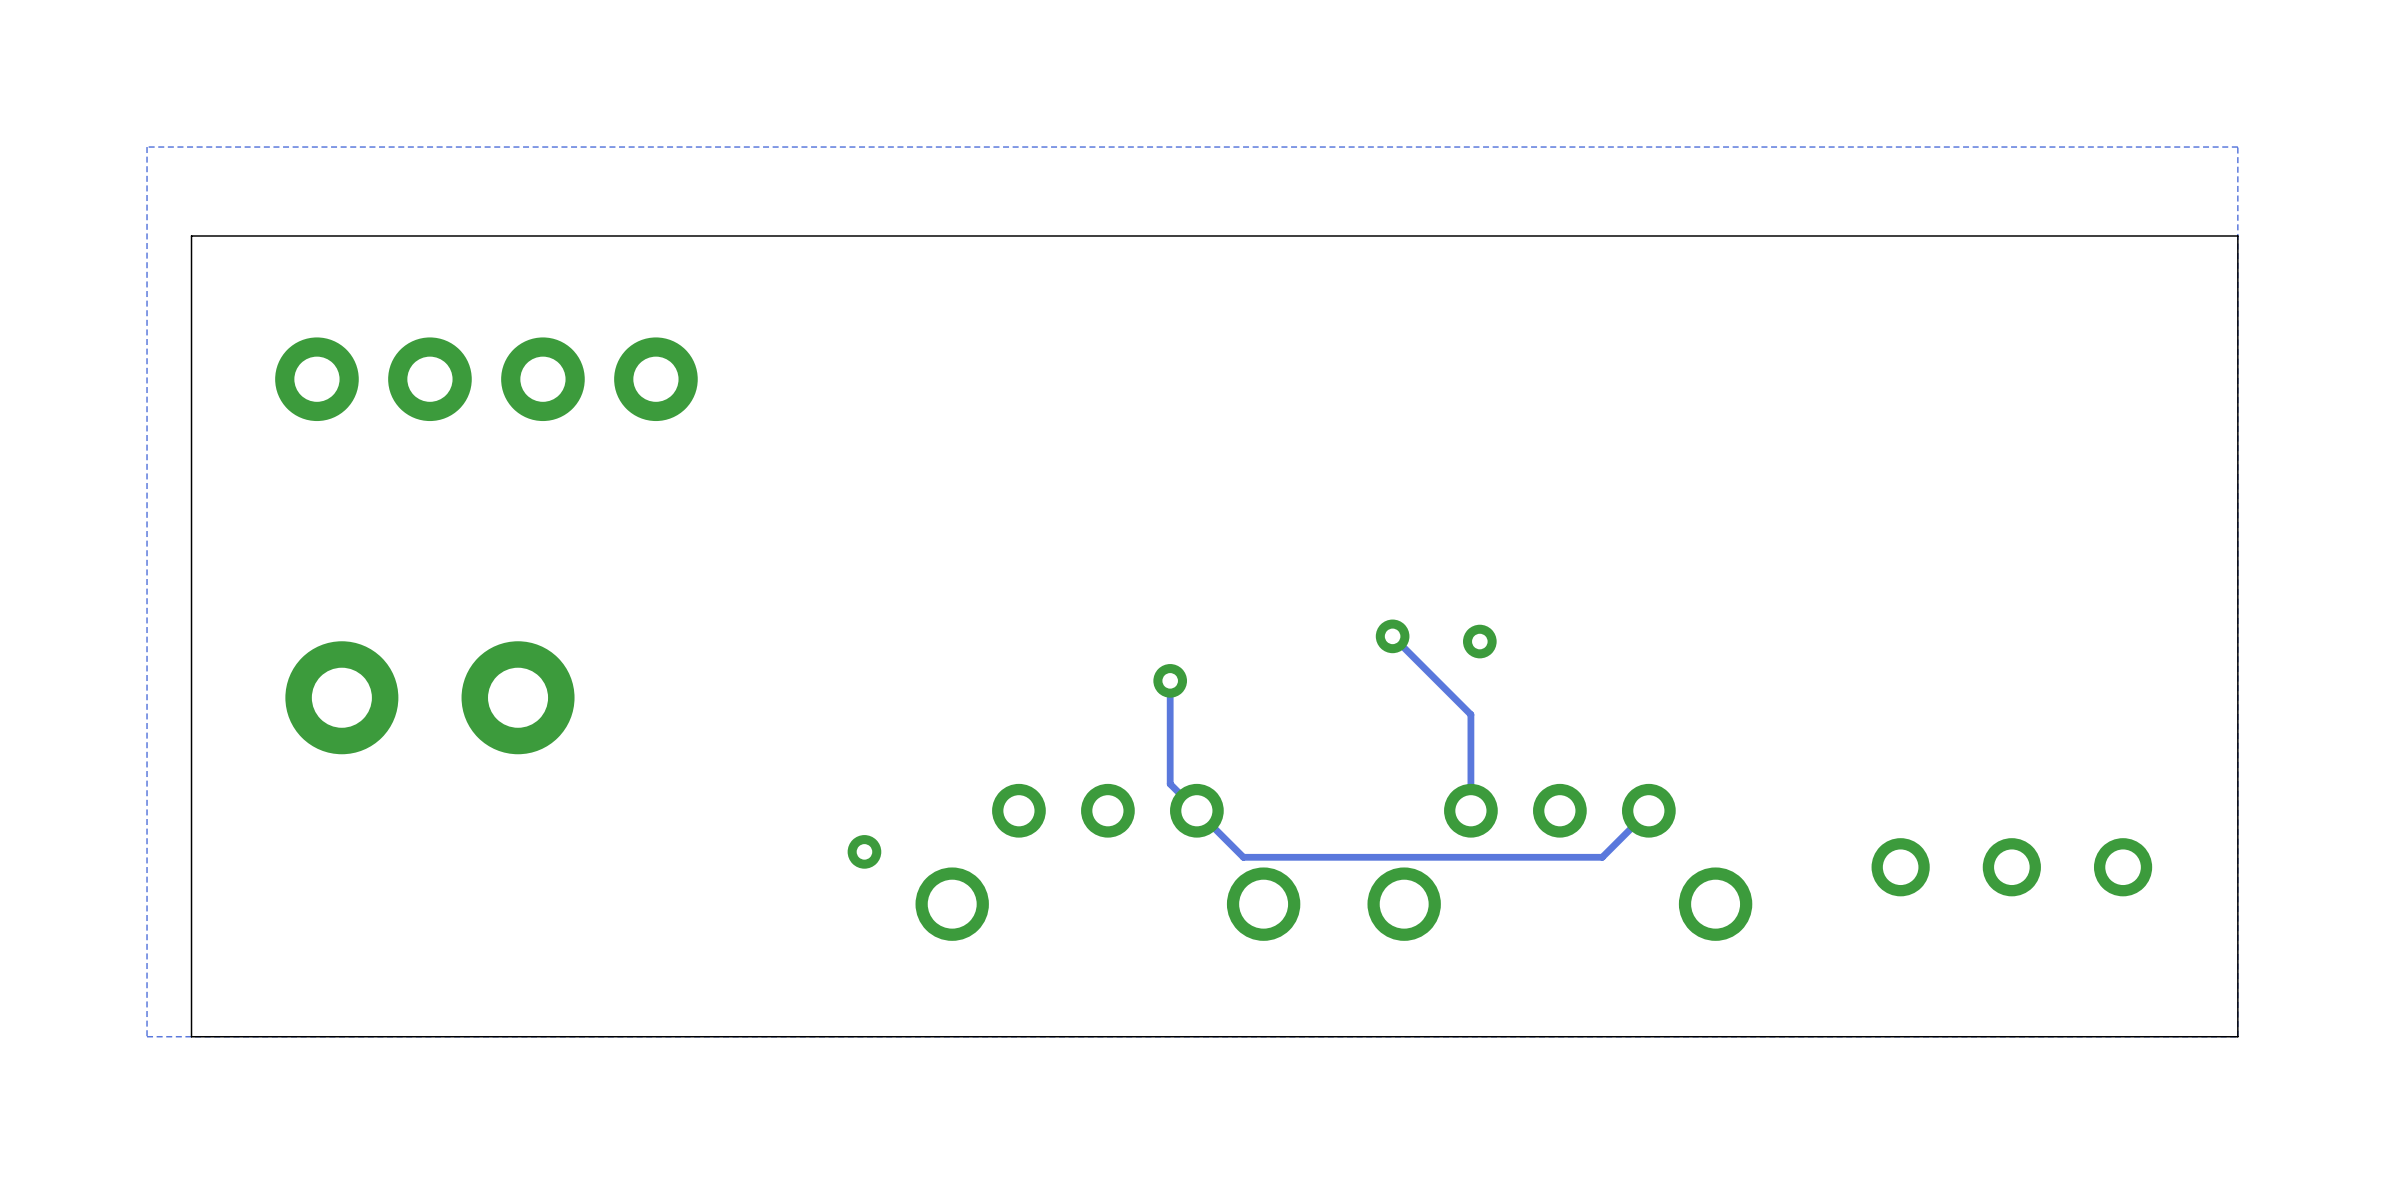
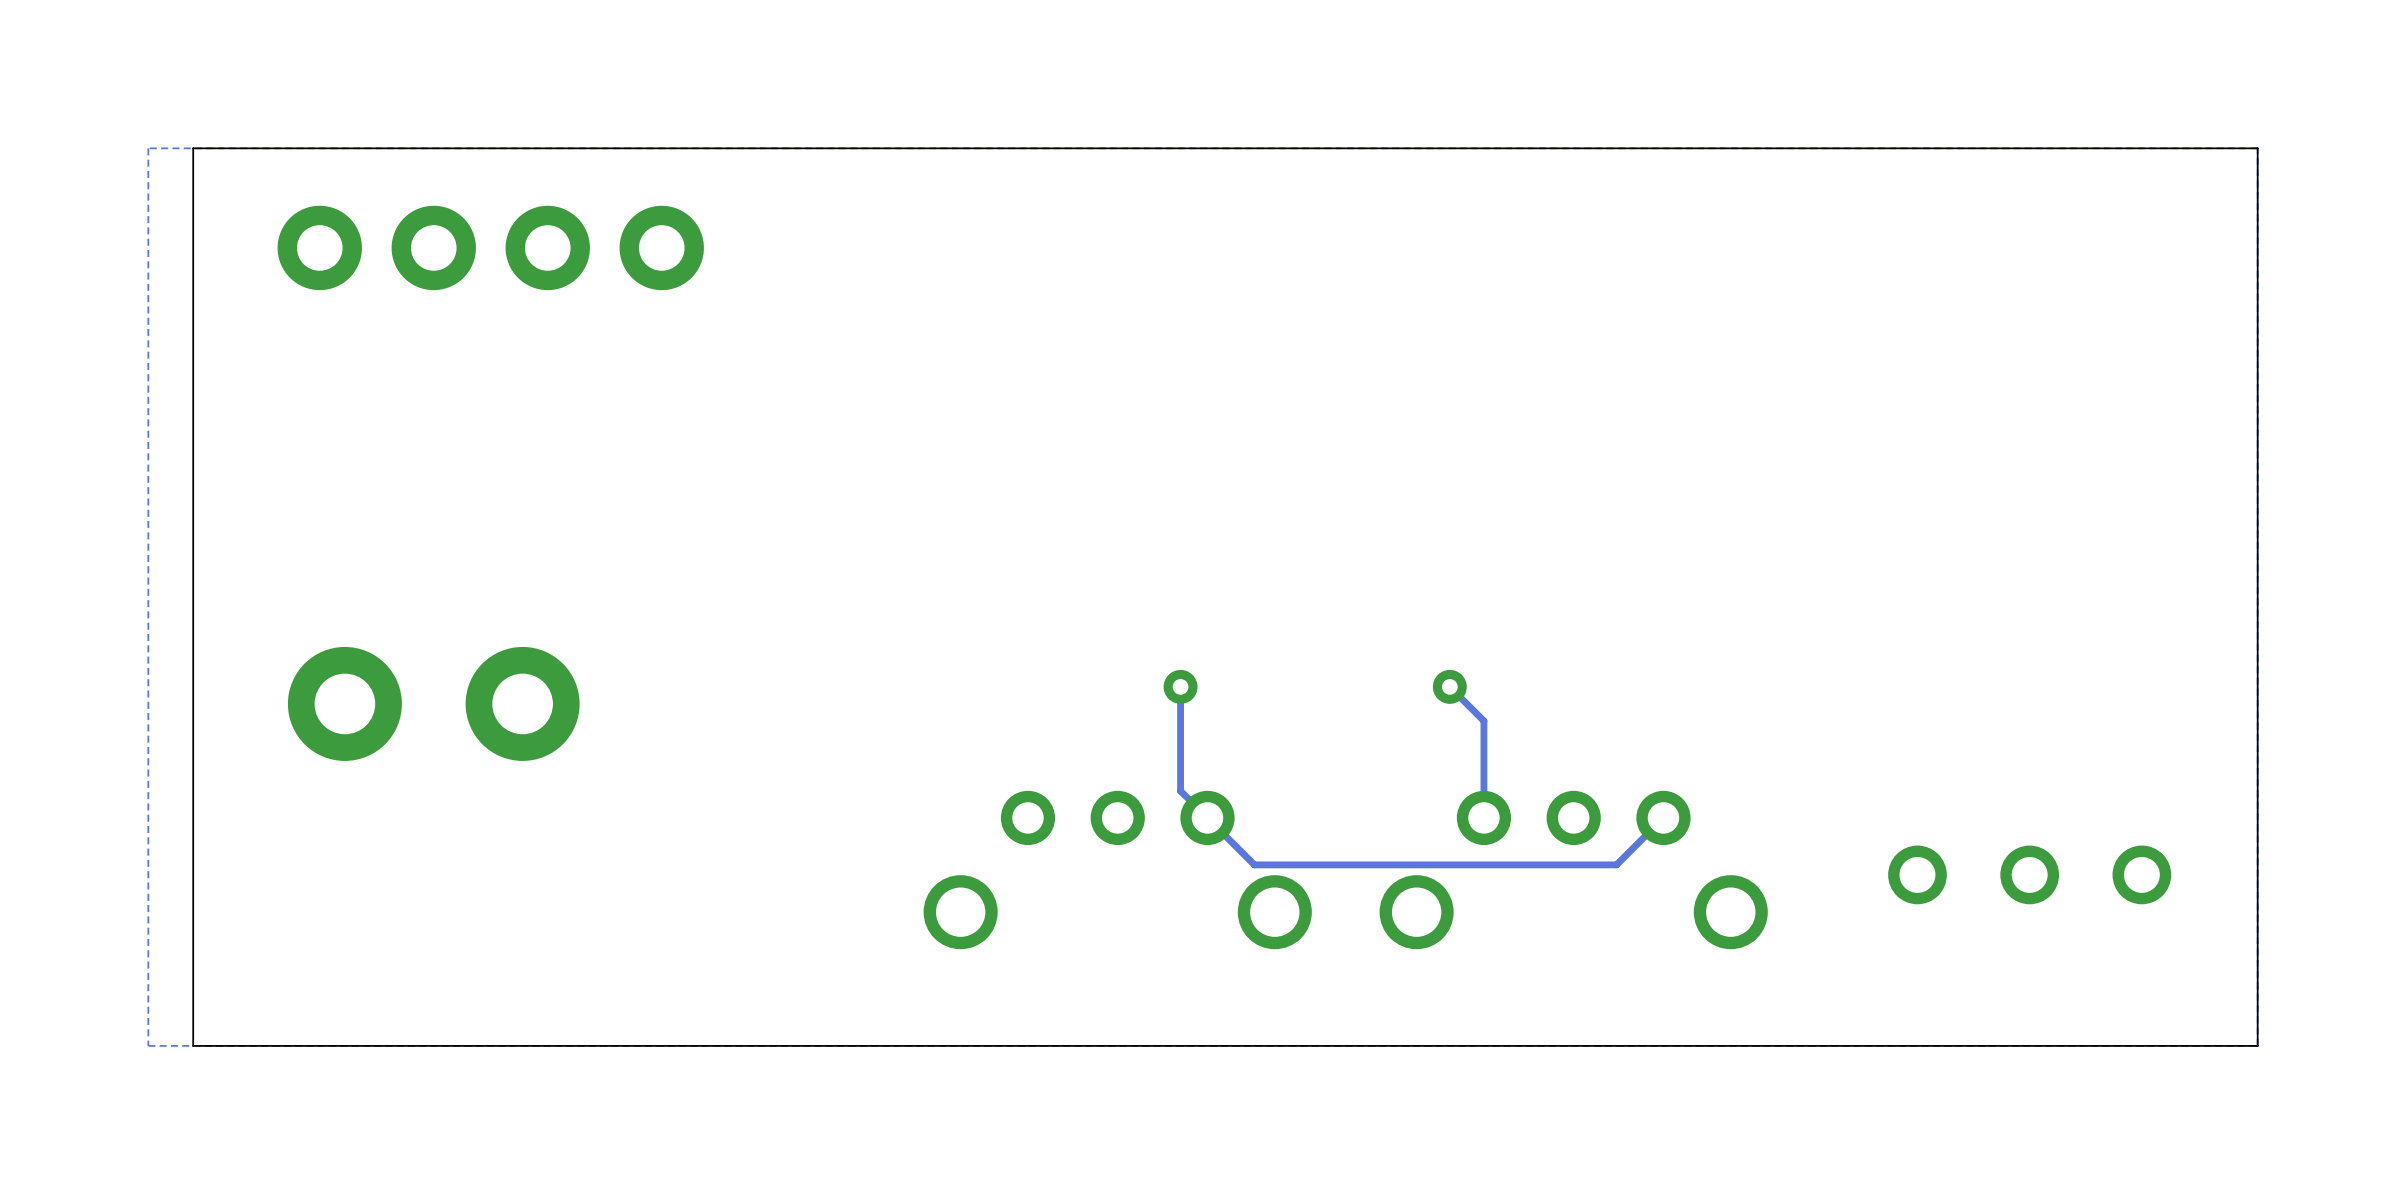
board edge: (2237, 235) (191, 235) -> (2257, 238) (2257, 148) (193, 148) (193, 238)
part position: (486, 379) -> (490, 247)
track: (1392, 636) (1437, 680) -> none
via: (1392, 636) -> none
via: (1479, 641) -> none
via: none -> (1449, 686)
via: (864, 851) -> none

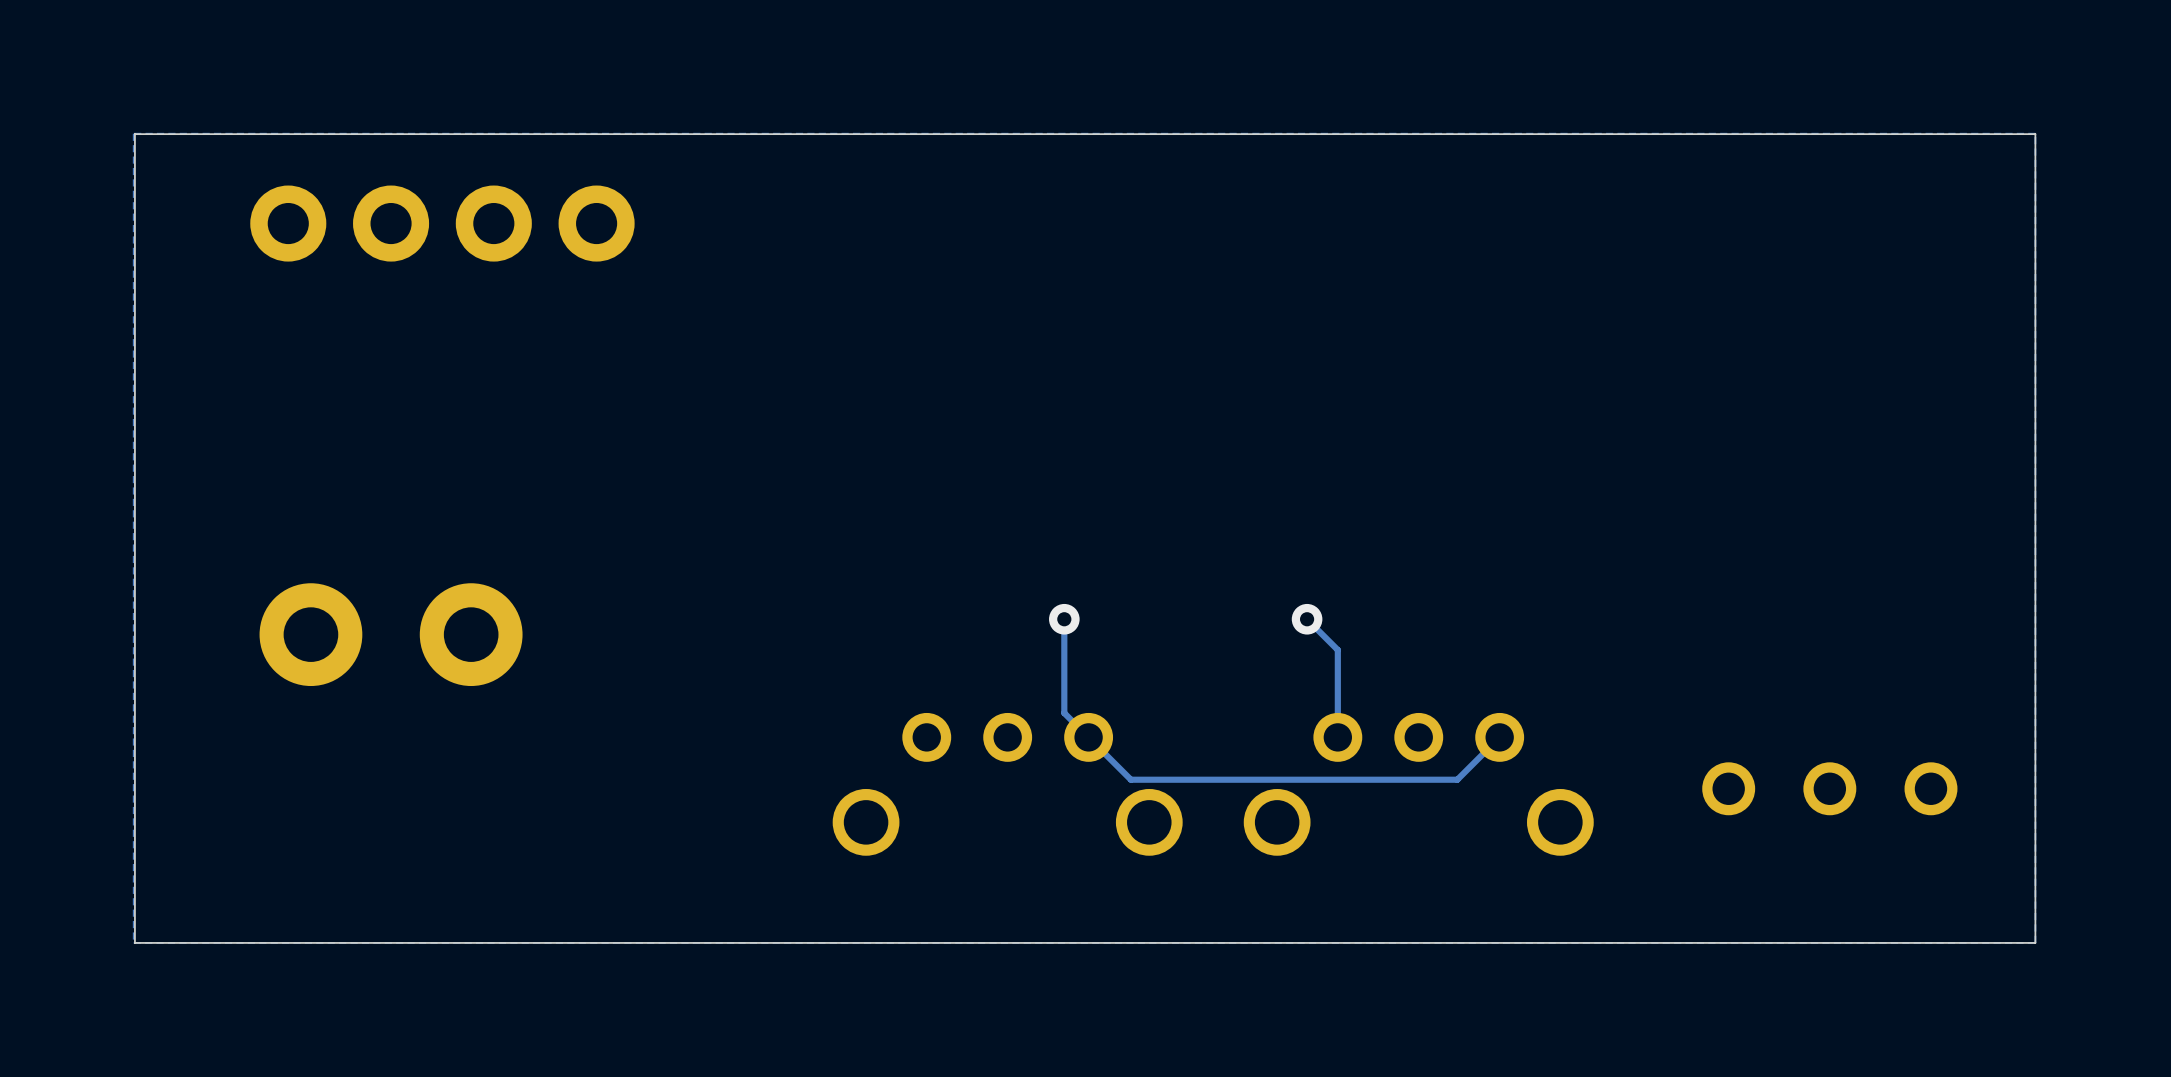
board edge: (2257, 148) (193, 148) (193, 1045) -> (2035, 134) (134, 134) (134, 942) (174, 942)

